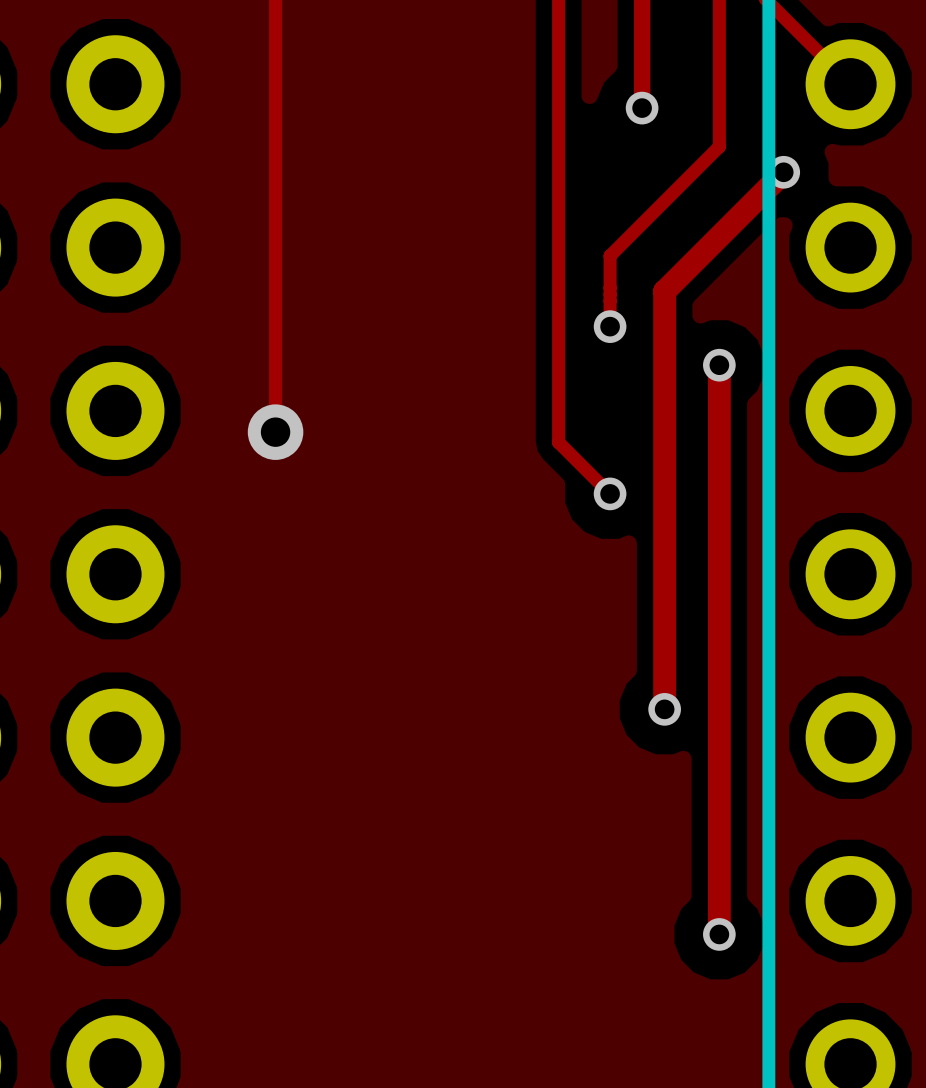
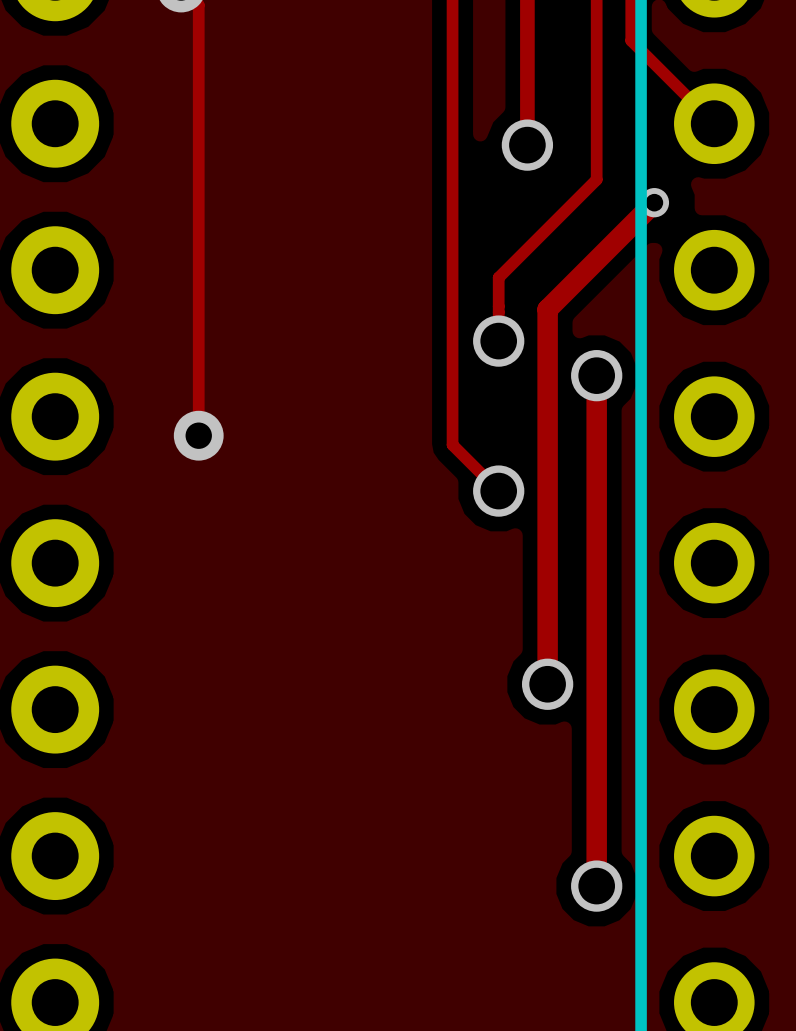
via size: [625, 91, 659, 125] -> [501, 119, 554, 171]
via size: [593, 310, 627, 343] -> [473, 315, 525, 367]
via size: [703, 348, 736, 382] -> [571, 350, 623, 402]
via size: [593, 477, 627, 511] -> [473, 465, 525, 517]
via size: [648, 693, 681, 726] -> [521, 658, 574, 710]
via size: [703, 918, 736, 951] -> [571, 860, 623, 912]

